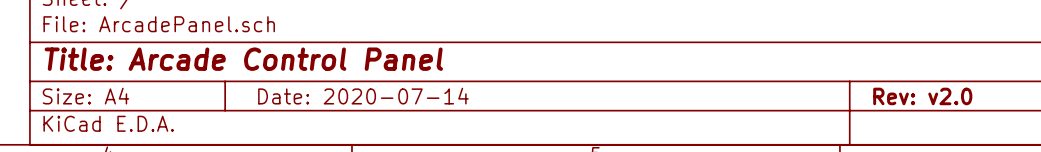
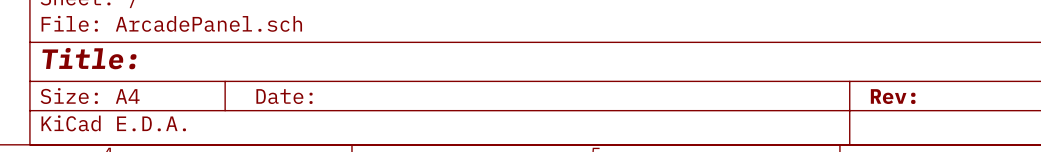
title block: Title: Arcade Control Panel (243, 59) -> Title: (89, 58)
title block: Date: 2020-07-14 (363, 96) -> Date: (284, 96)
title block: Rev: v2.0 (922, 96) -> Rev: (893, 96)

